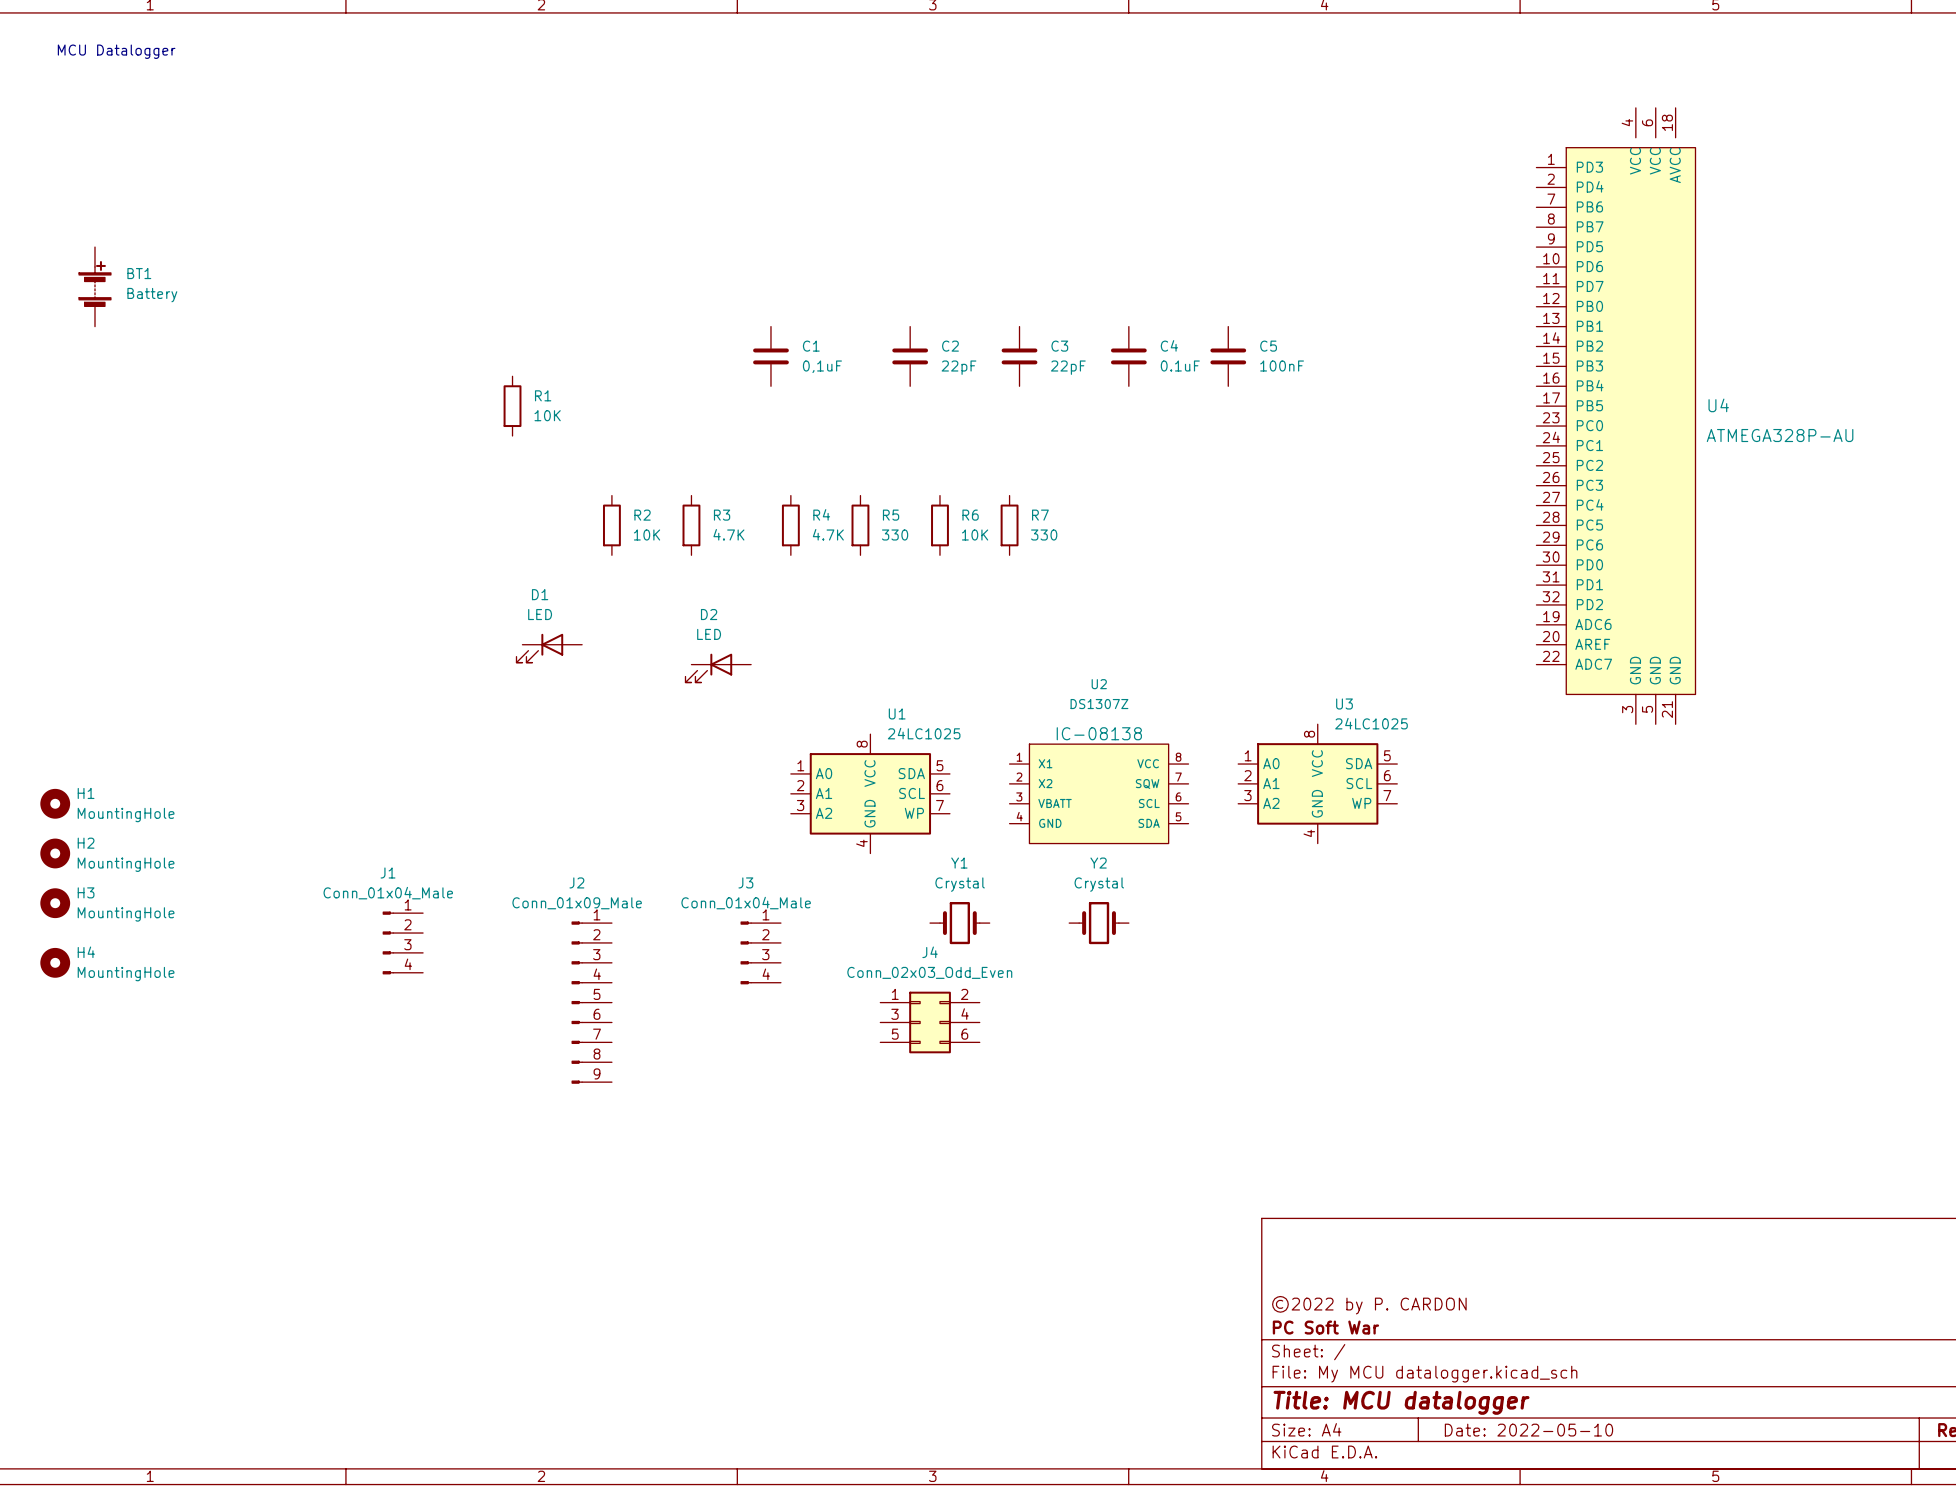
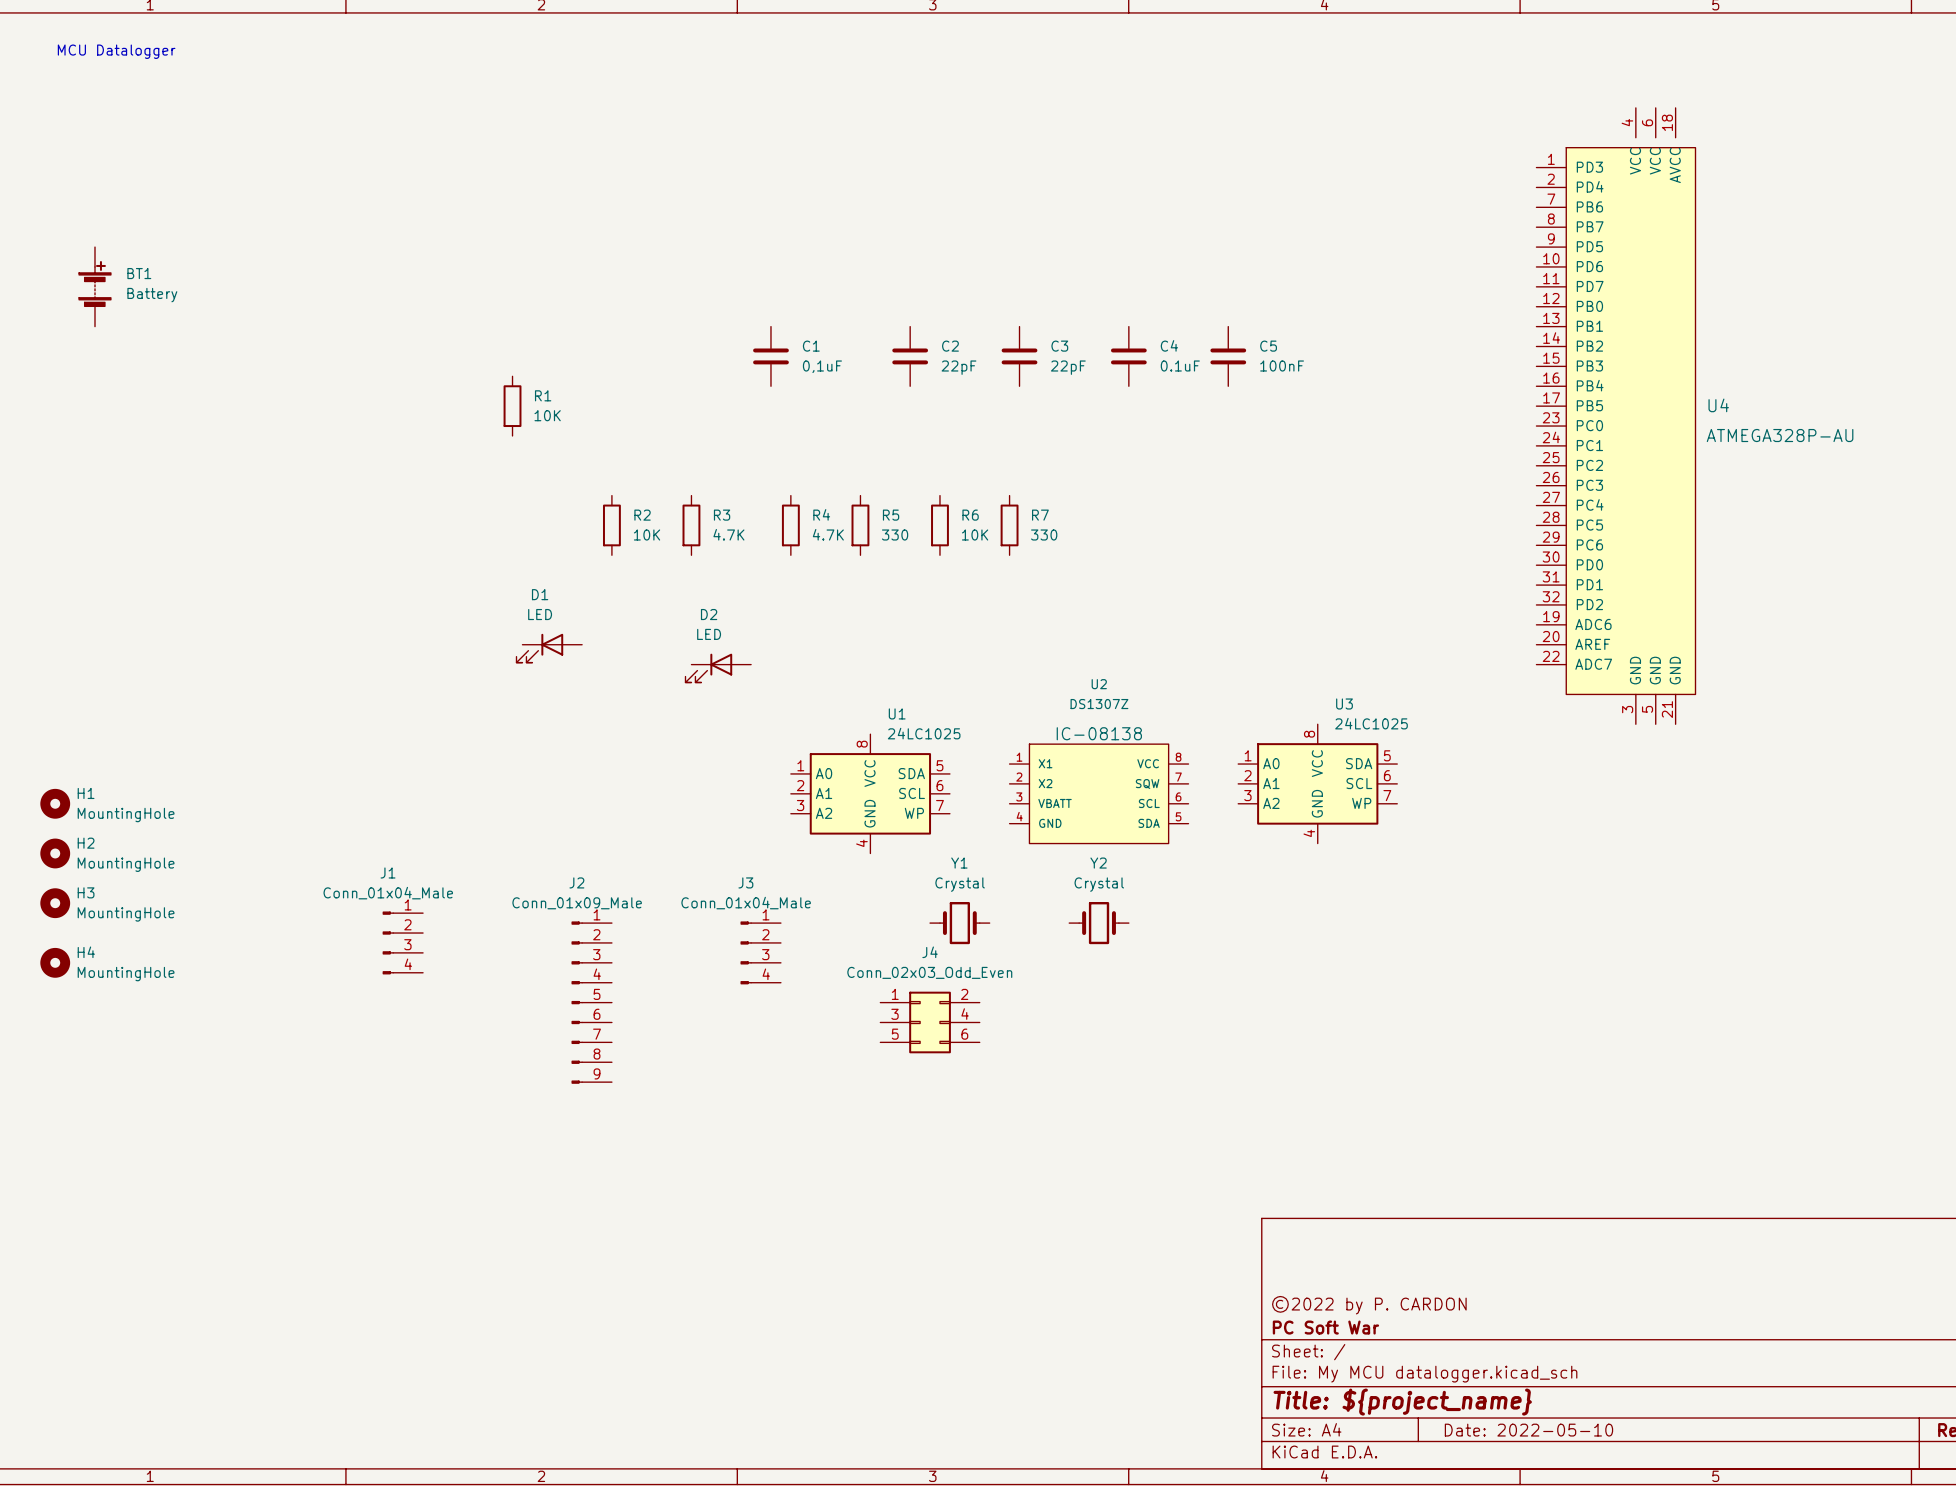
title block: Title: MCU datalogger (1401, 1402) -> Title: ${project_name} (1402, 1402)

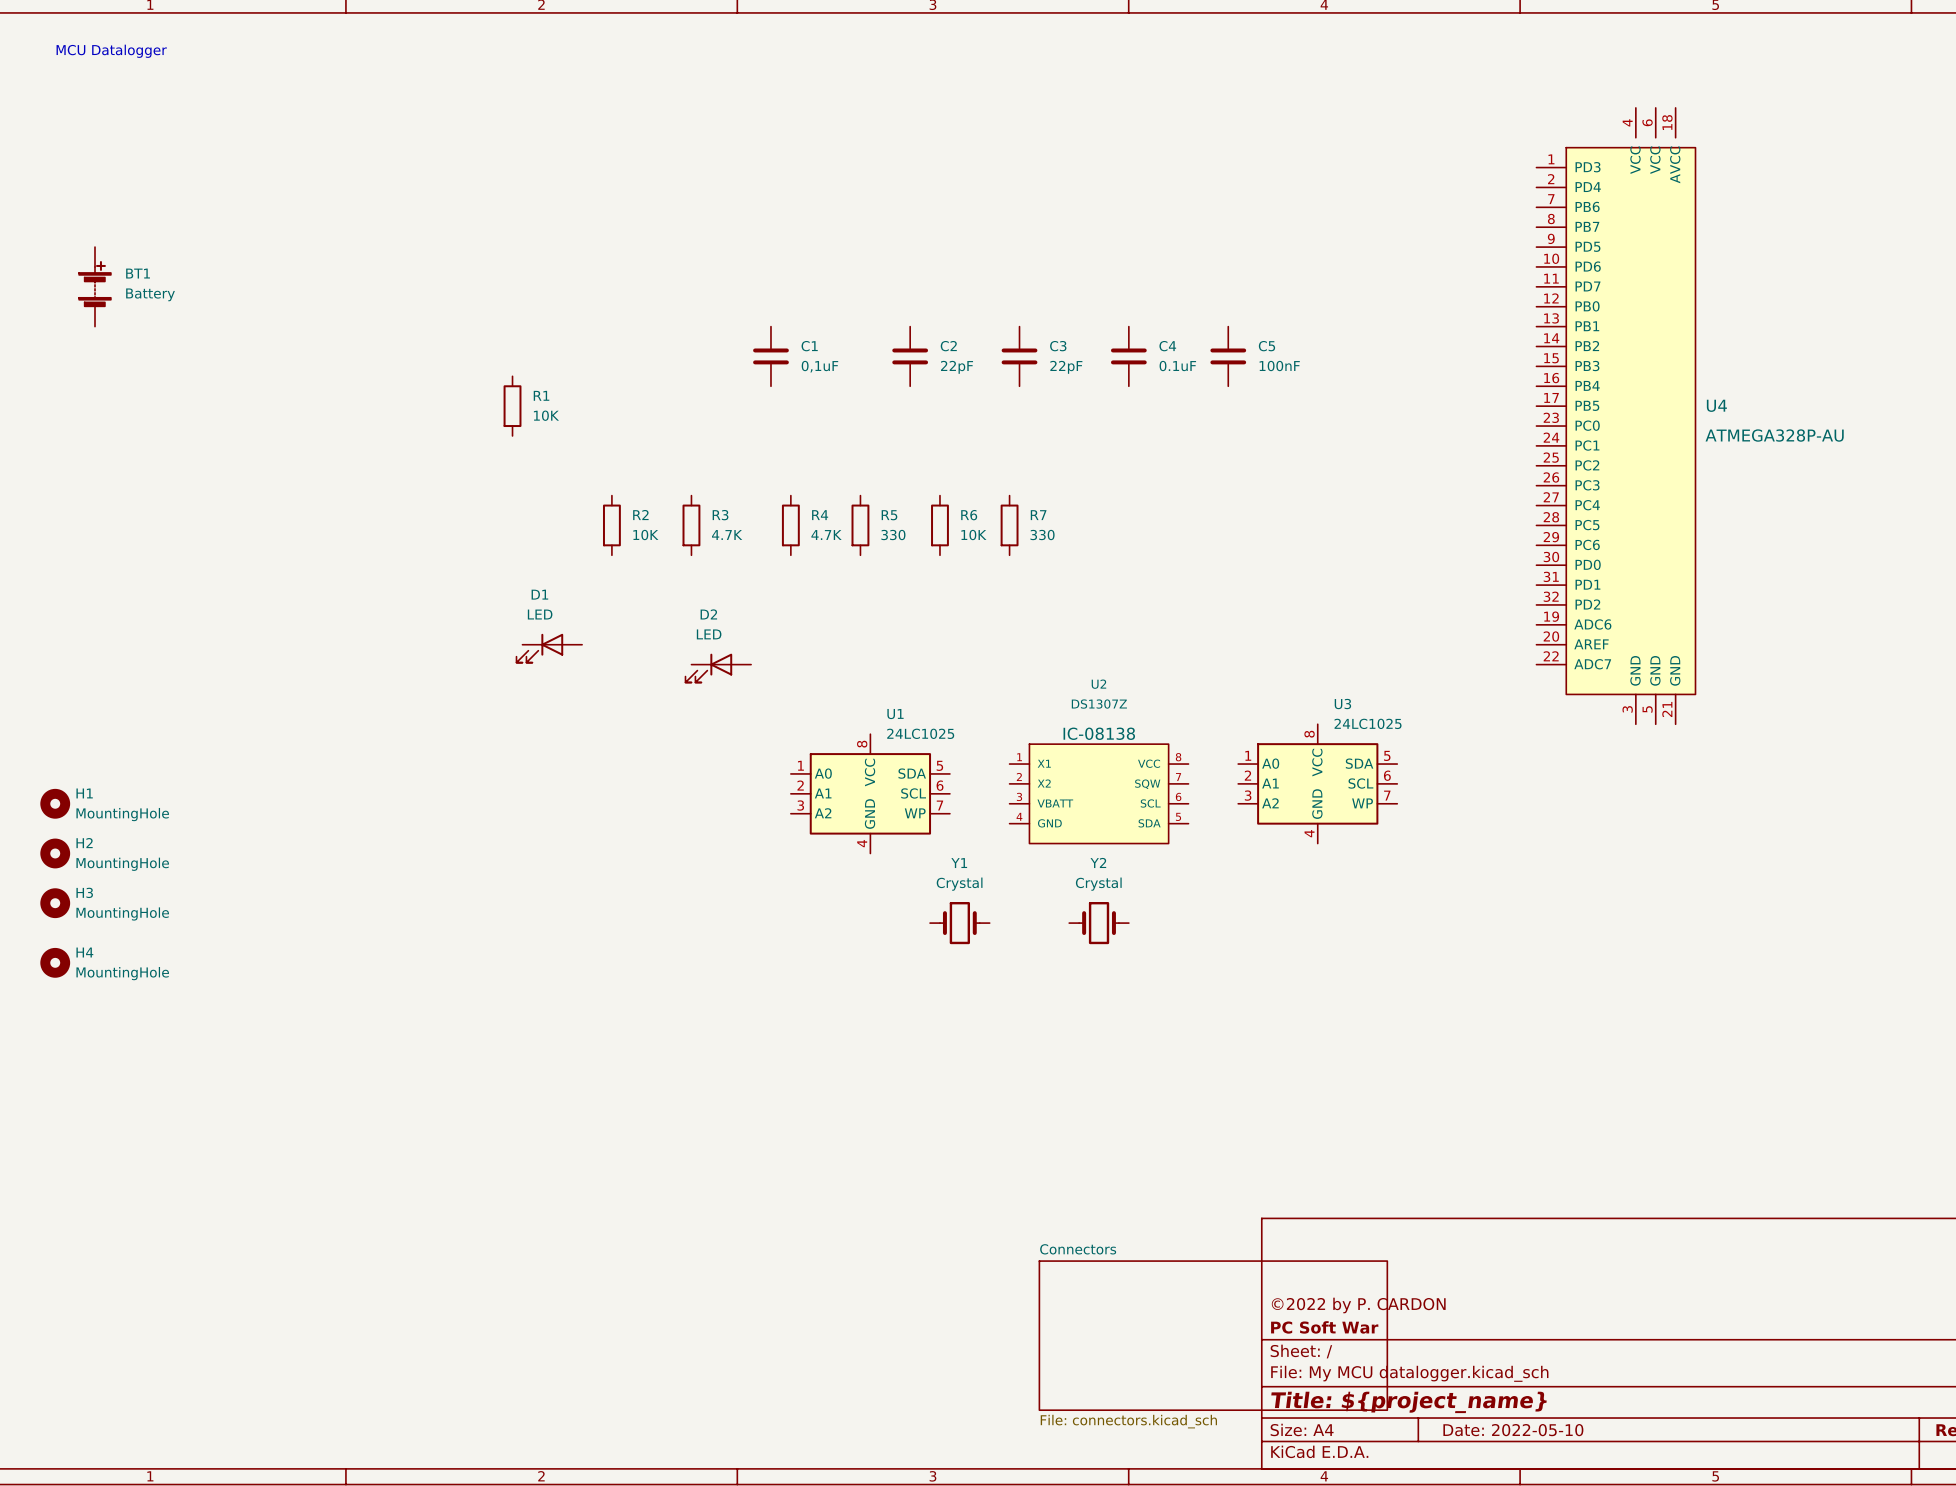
J1: Conn_01x04_Male (402, 942) -> none
J3: Conn_01x04_Male (760, 952) -> none
J2: Conn_01x09_Male (591, 1002) -> none
J4: Conn_02x03_Odd_Even (930, 1022) -> none
sheet Connectors: none -> File: connectors.kicad_sch (1213, 1335)

